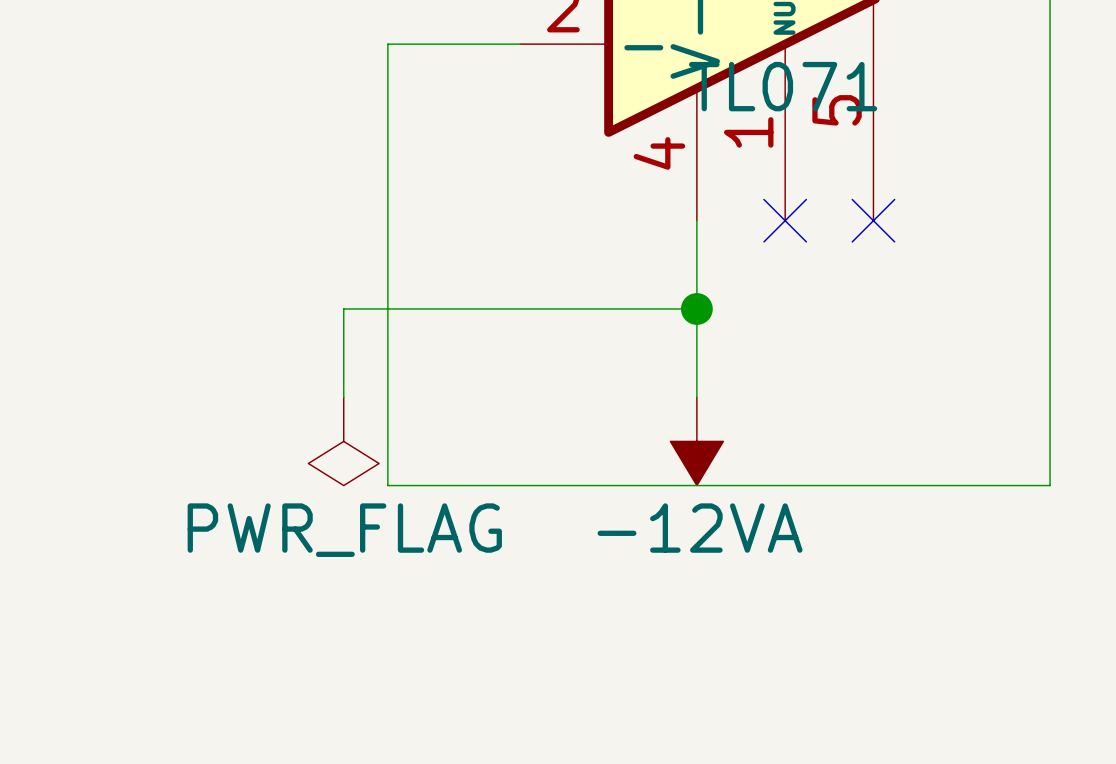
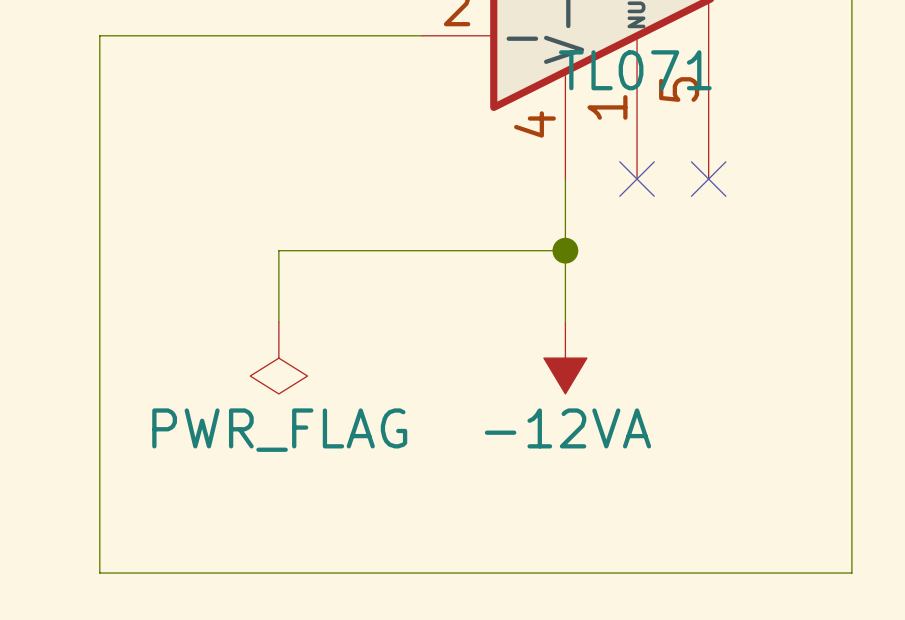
wire: (387, 44) (387, 485) (1050, 485) -> (314, 35) (99, 35) (99, 573) (851, 573) (851, 393)

